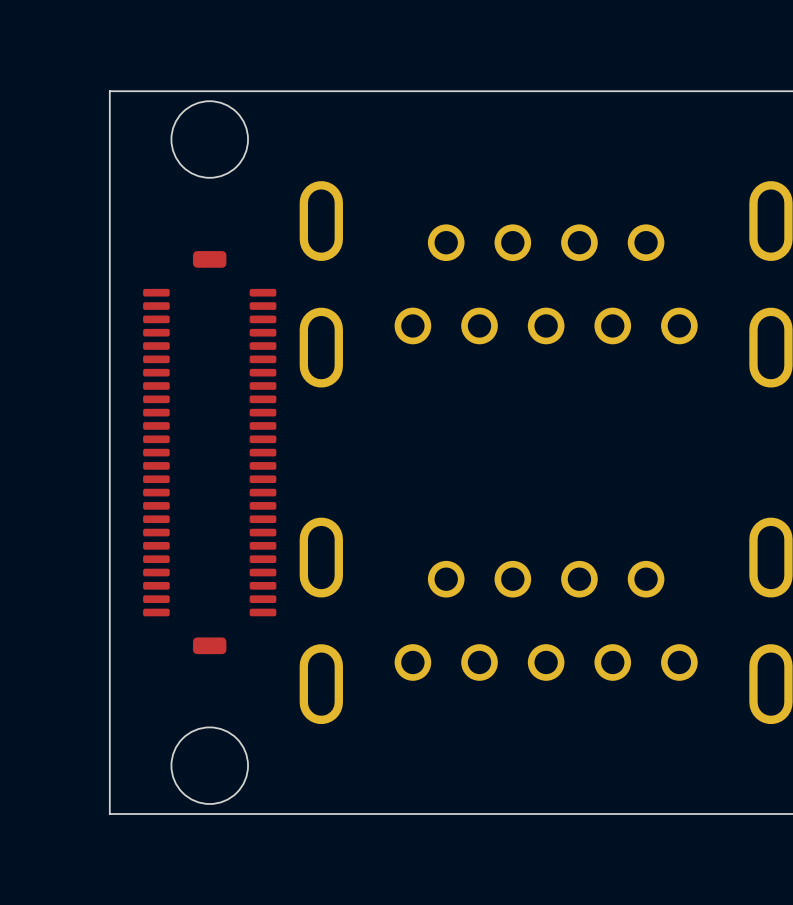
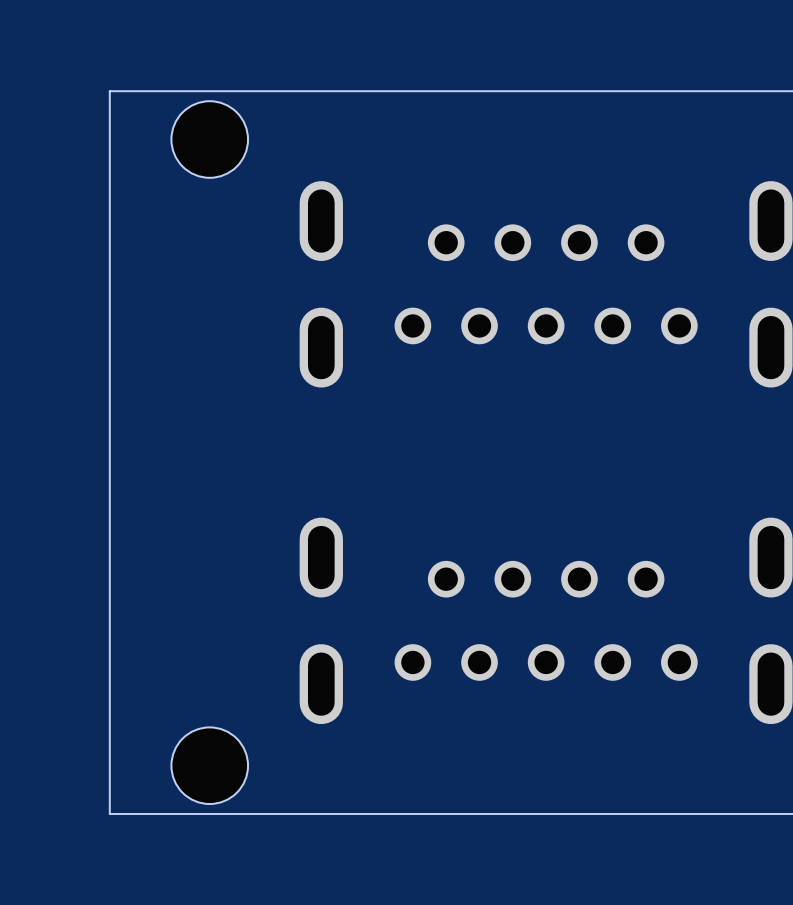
part: (209, 452) -> none

